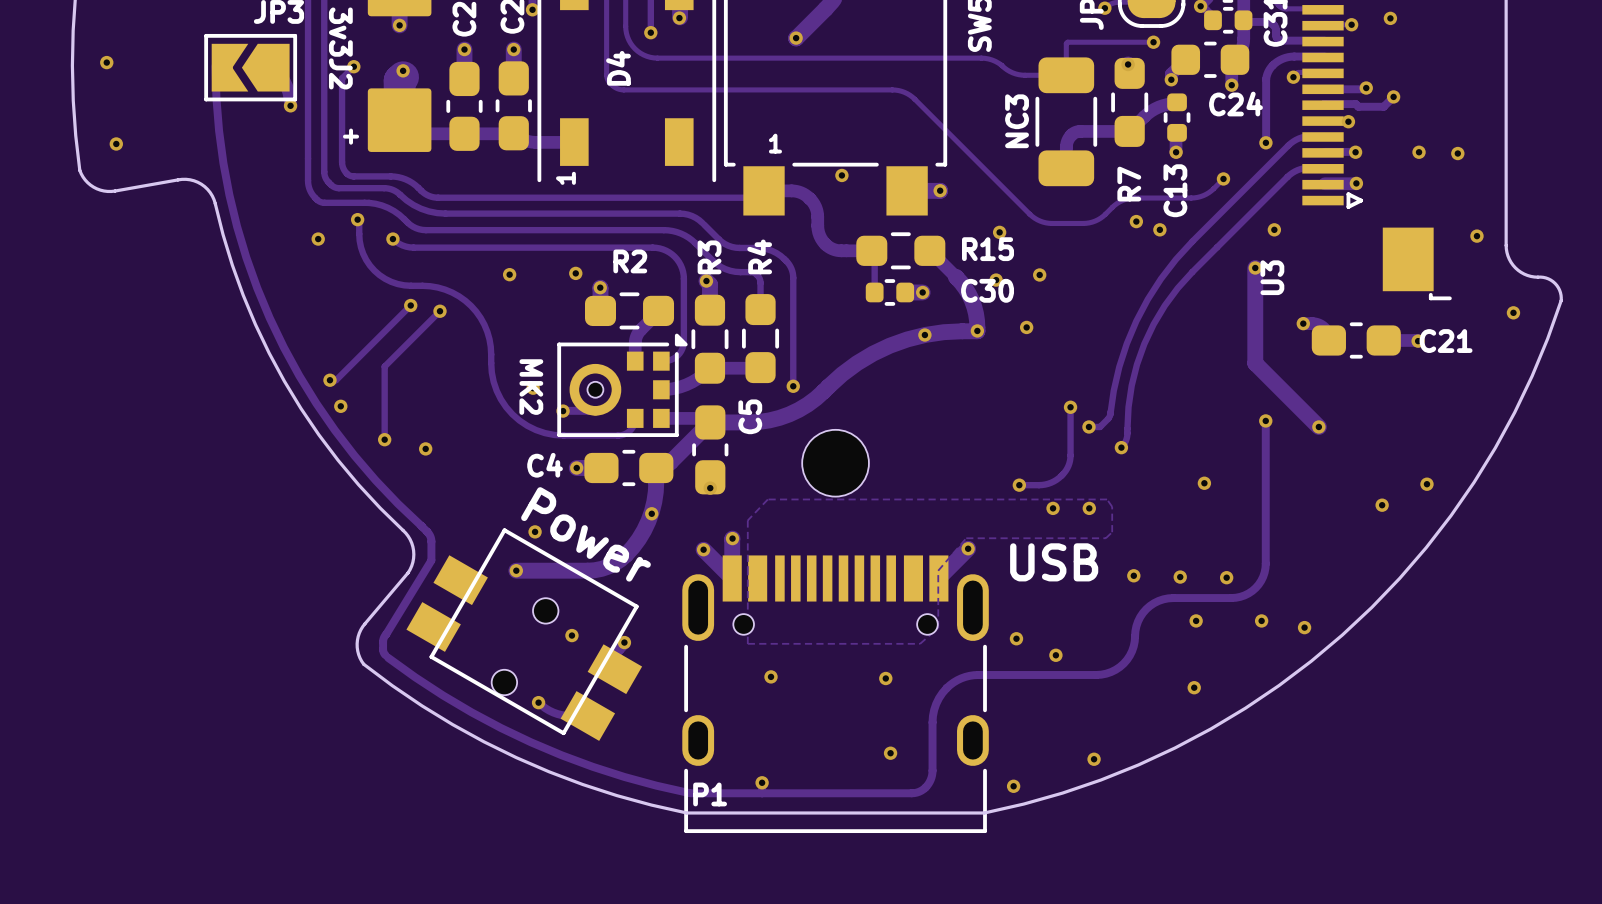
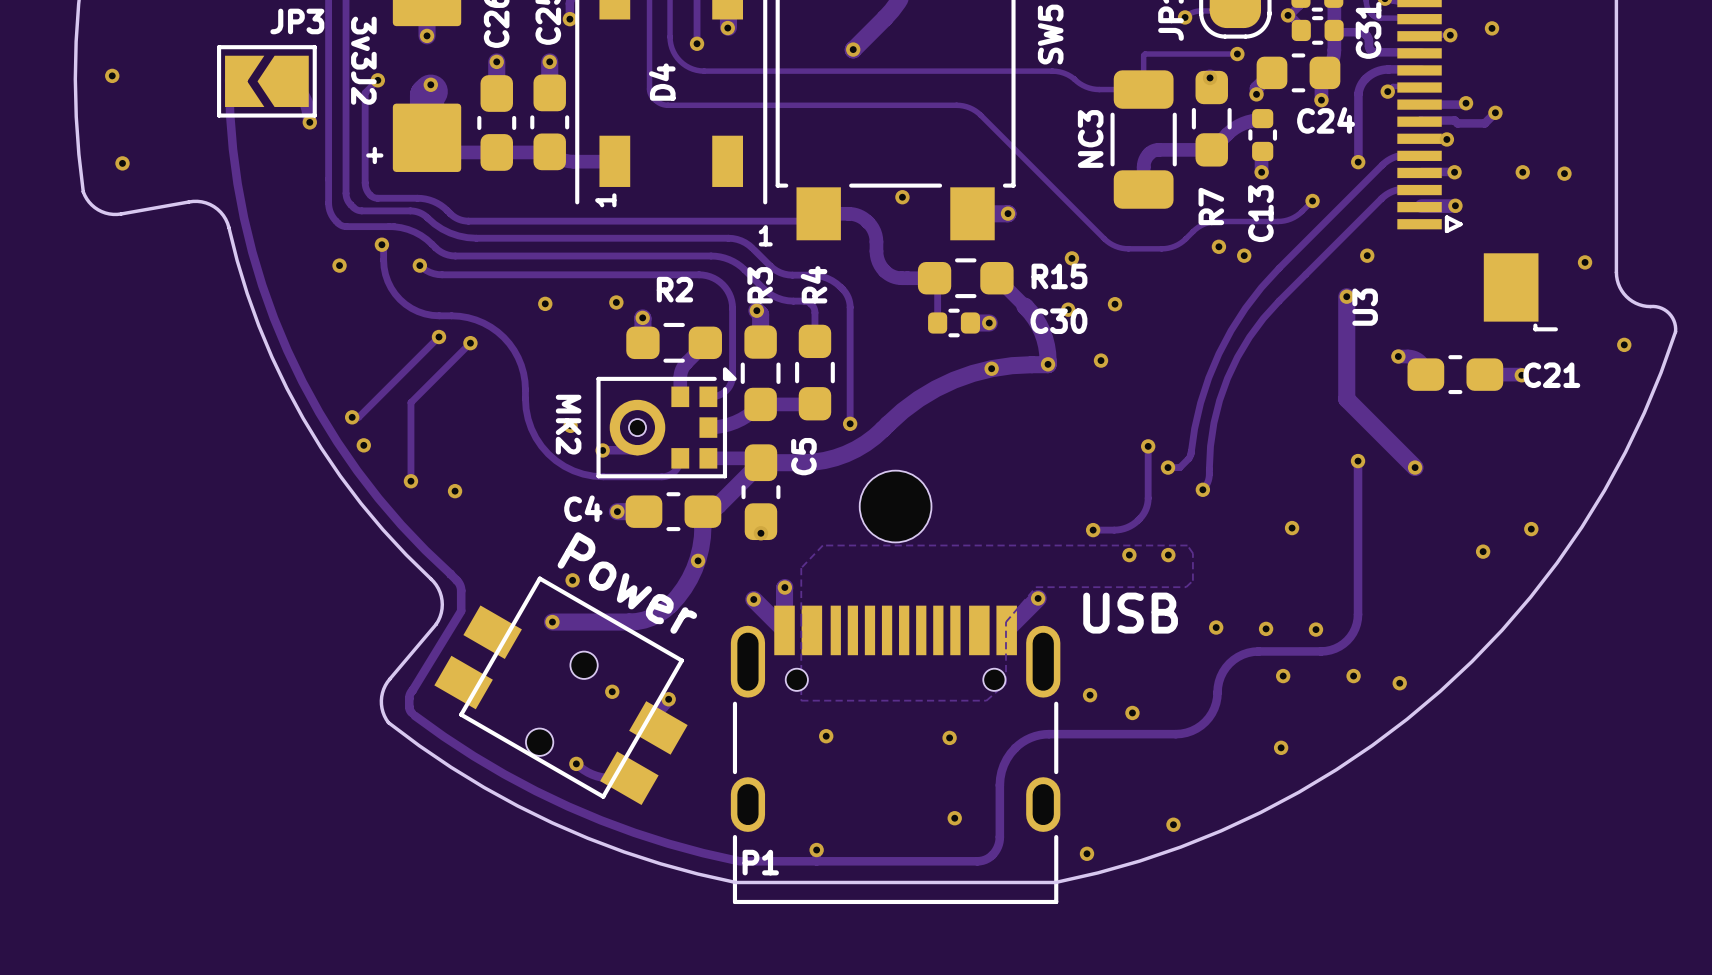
text position: 1 (775, 143) -> 1 (765, 235)

